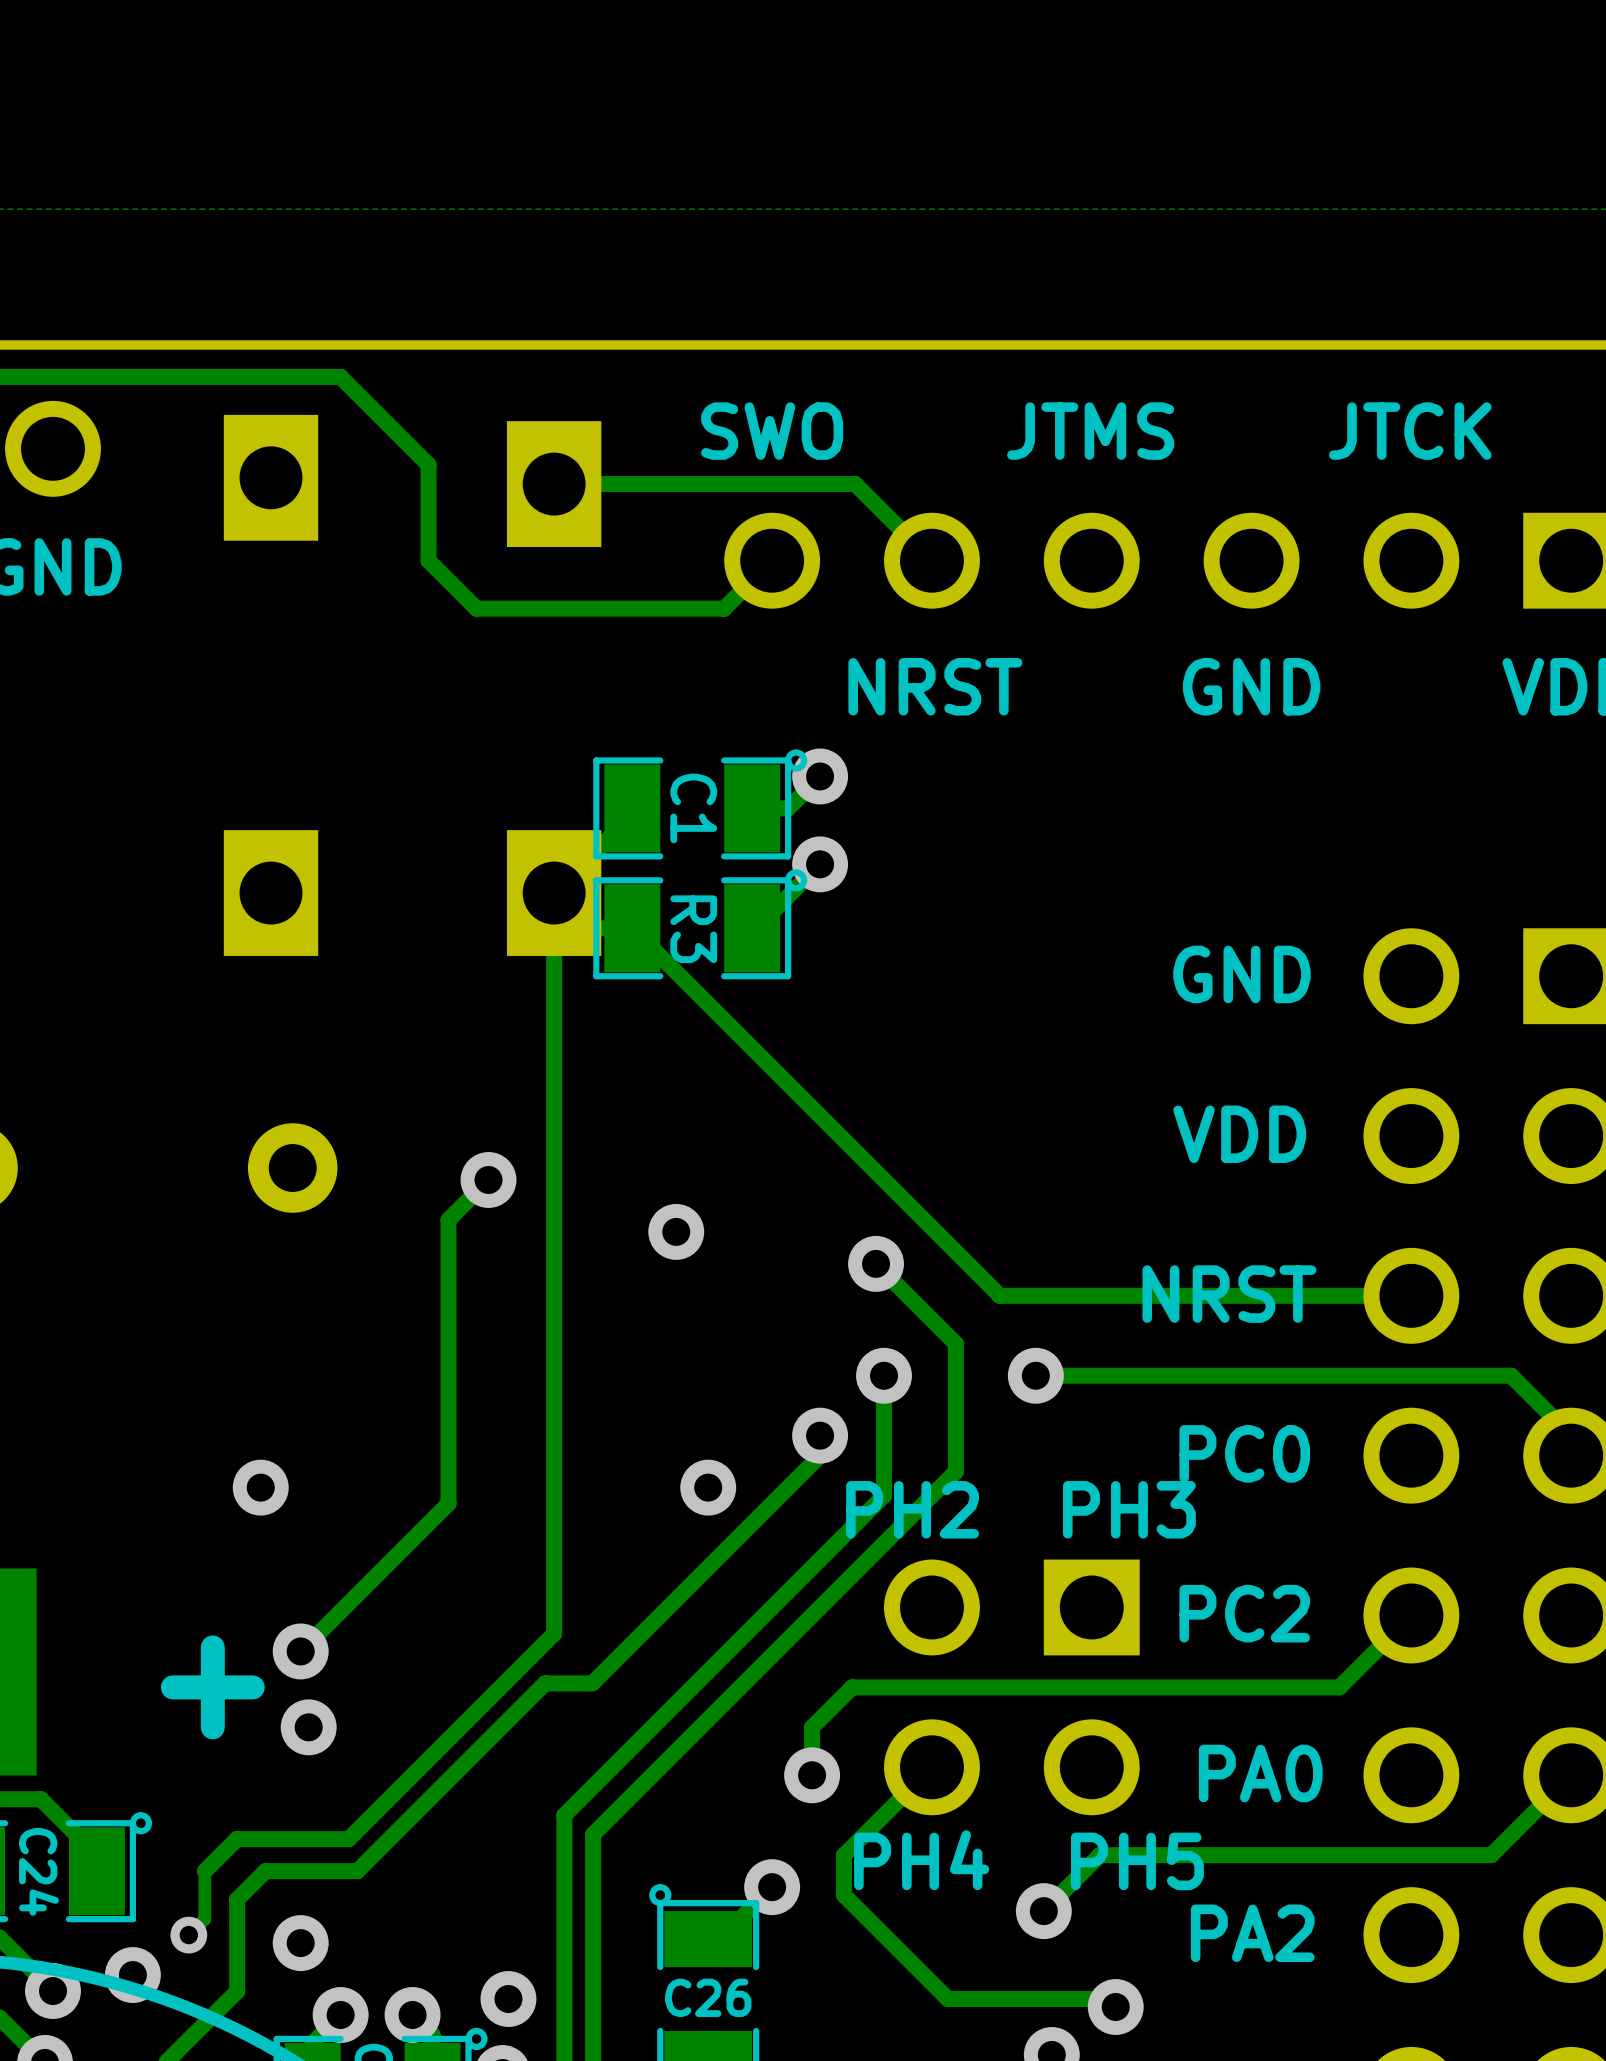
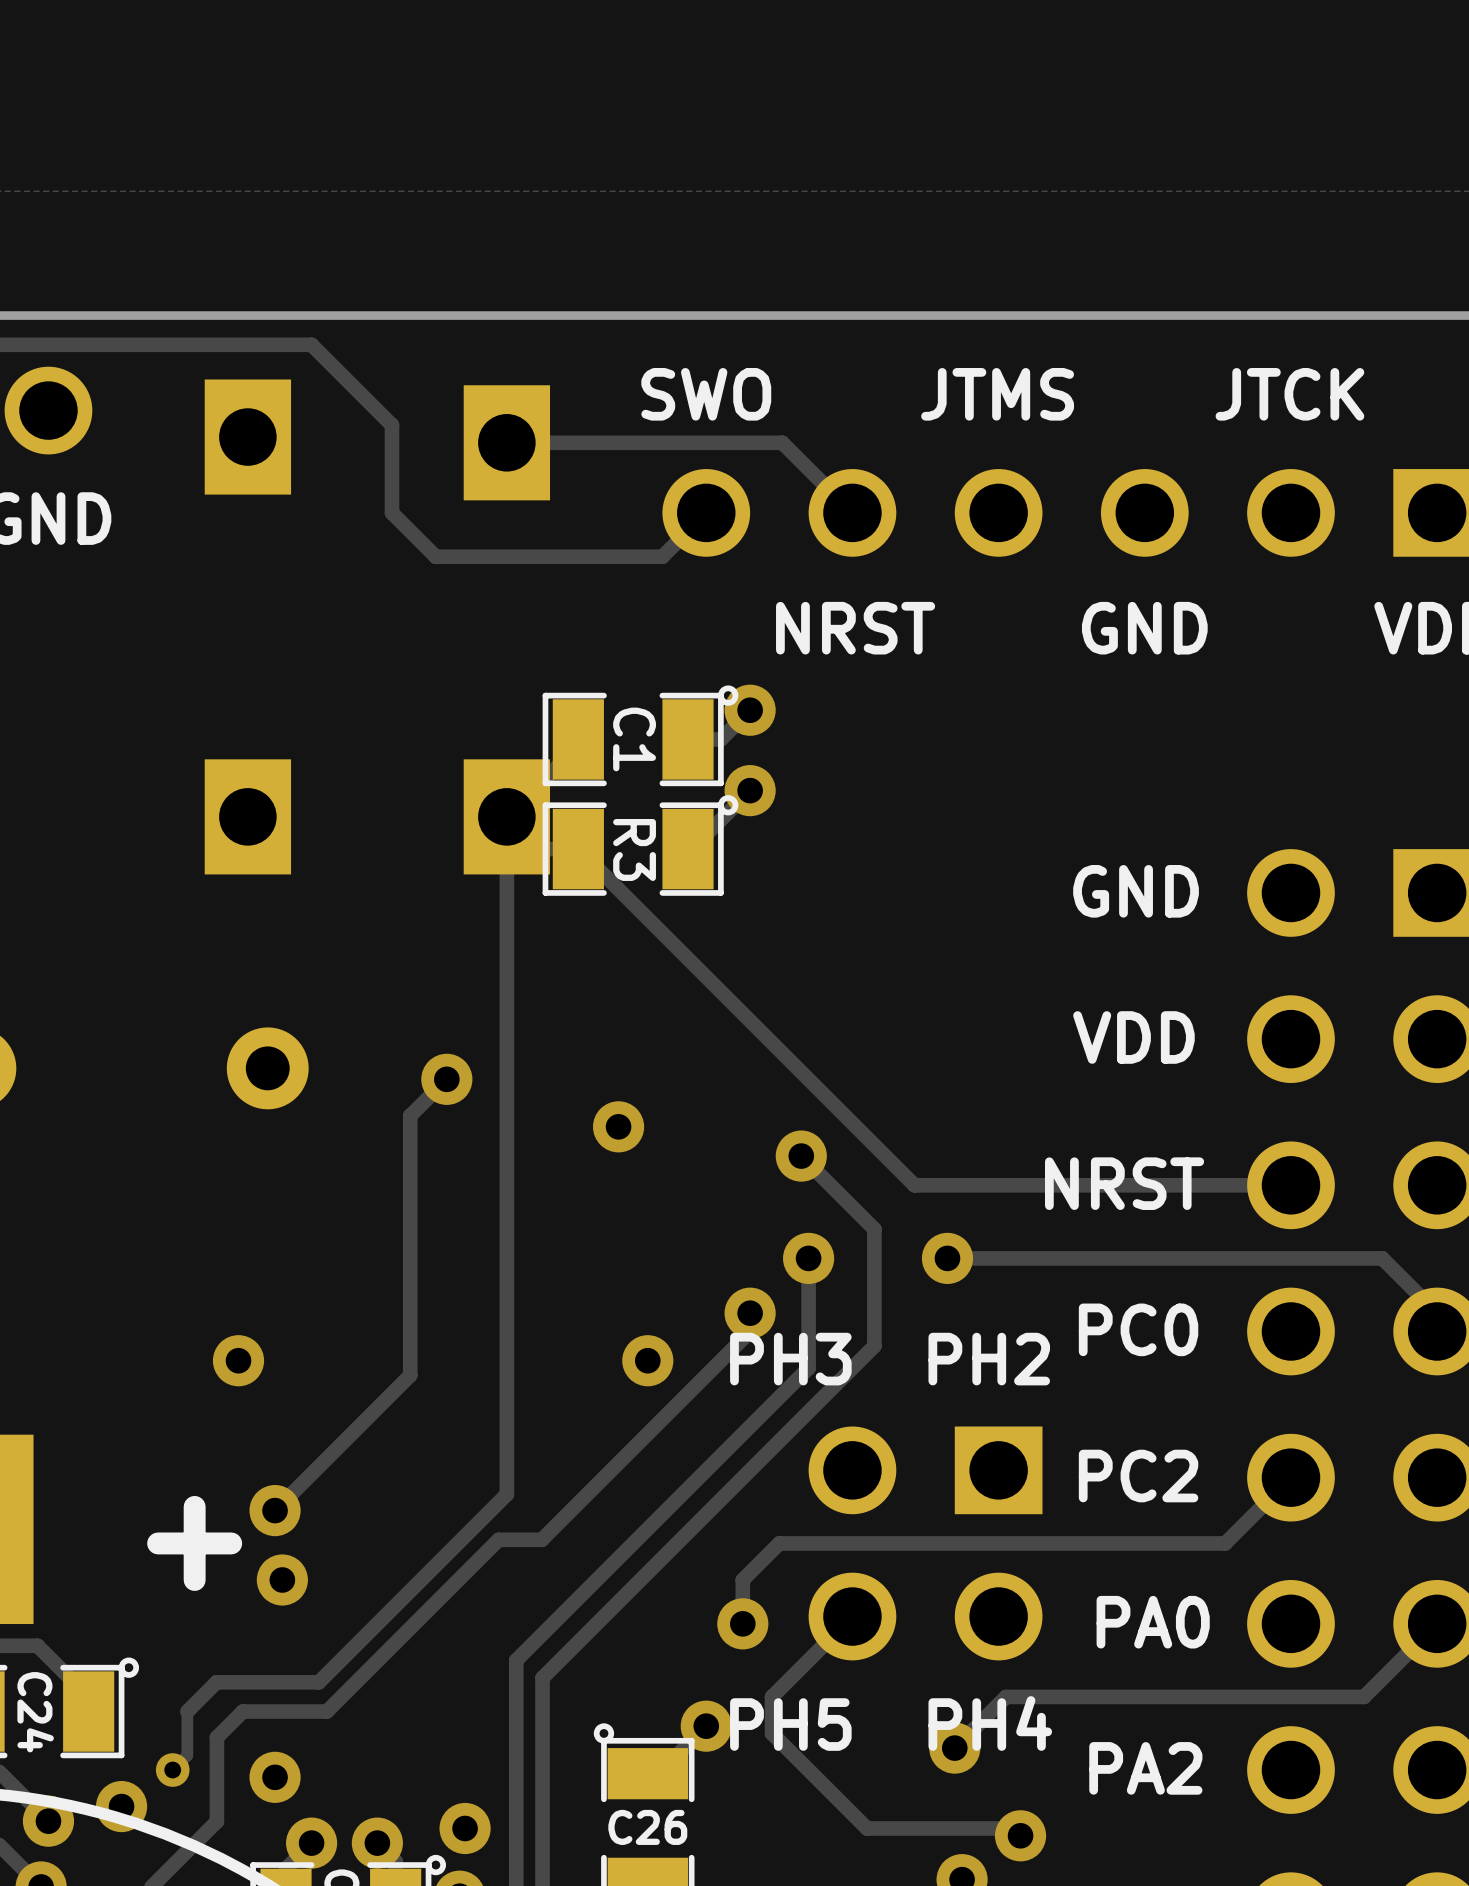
text: PH2 PH3 (1020, 1509) -> PH3 PH2 (890, 1359)
text: PH4 PH5 (1028, 1860) -> PH5 PH4 (891, 1723)

